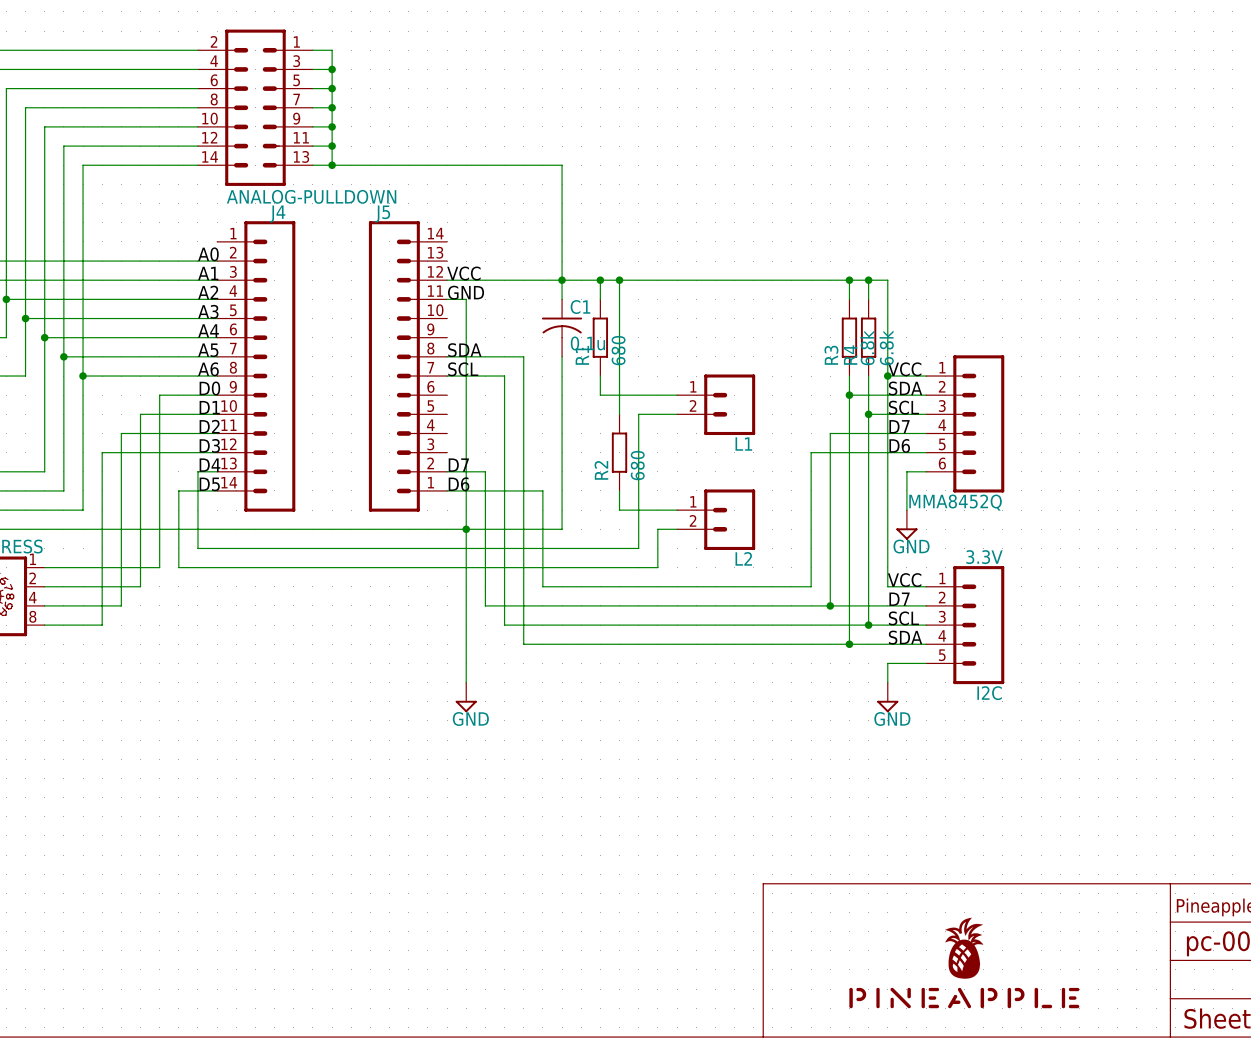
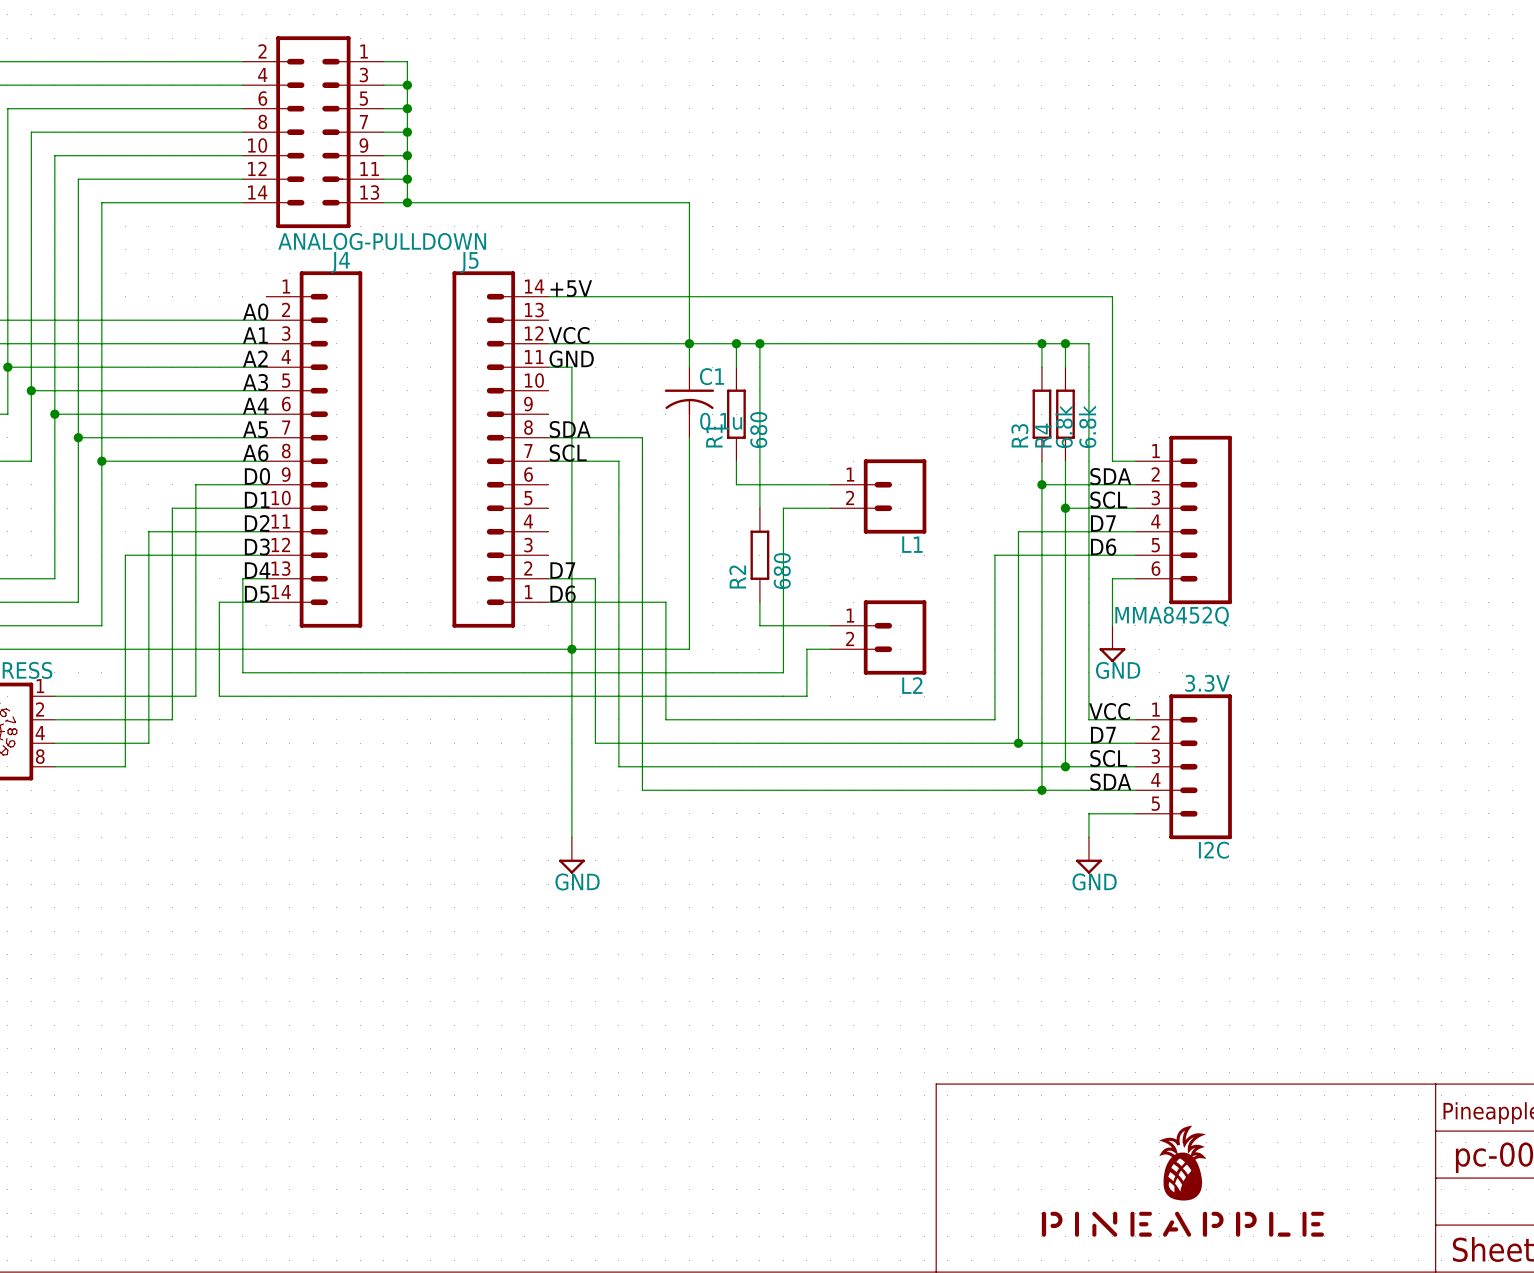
label: none -> +5V (571, 288)
label: VCC (904, 369) -> none
wire: (887, 376) (906, 376) -> (548, 296) (1112, 296) (1112, 461)
junction: (887, 376) -> none

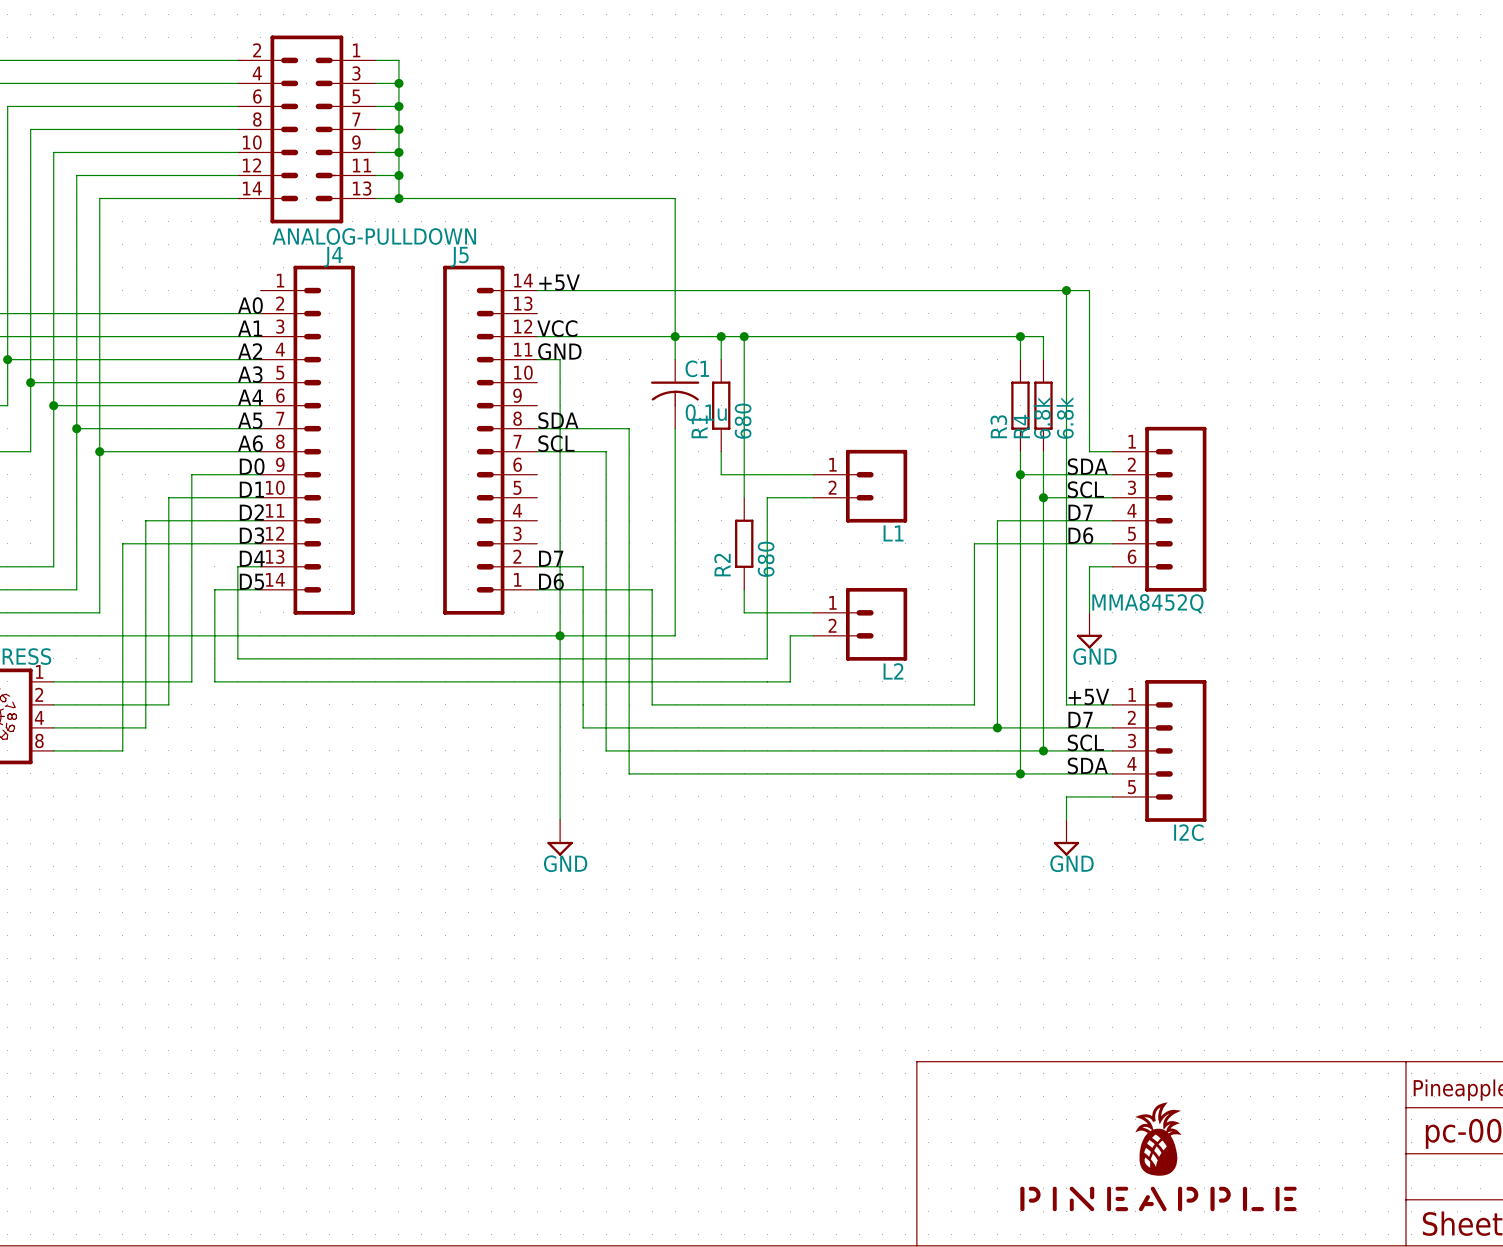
wire: (1065, 343) (1088, 343) -> (1066, 290) (1066, 336)
junction position: (1065, 343) -> (1066, 290)
I2C value: 3.3V (1207, 683) -> none
label: VCC (1109, 711) -> +5V (1088, 697)

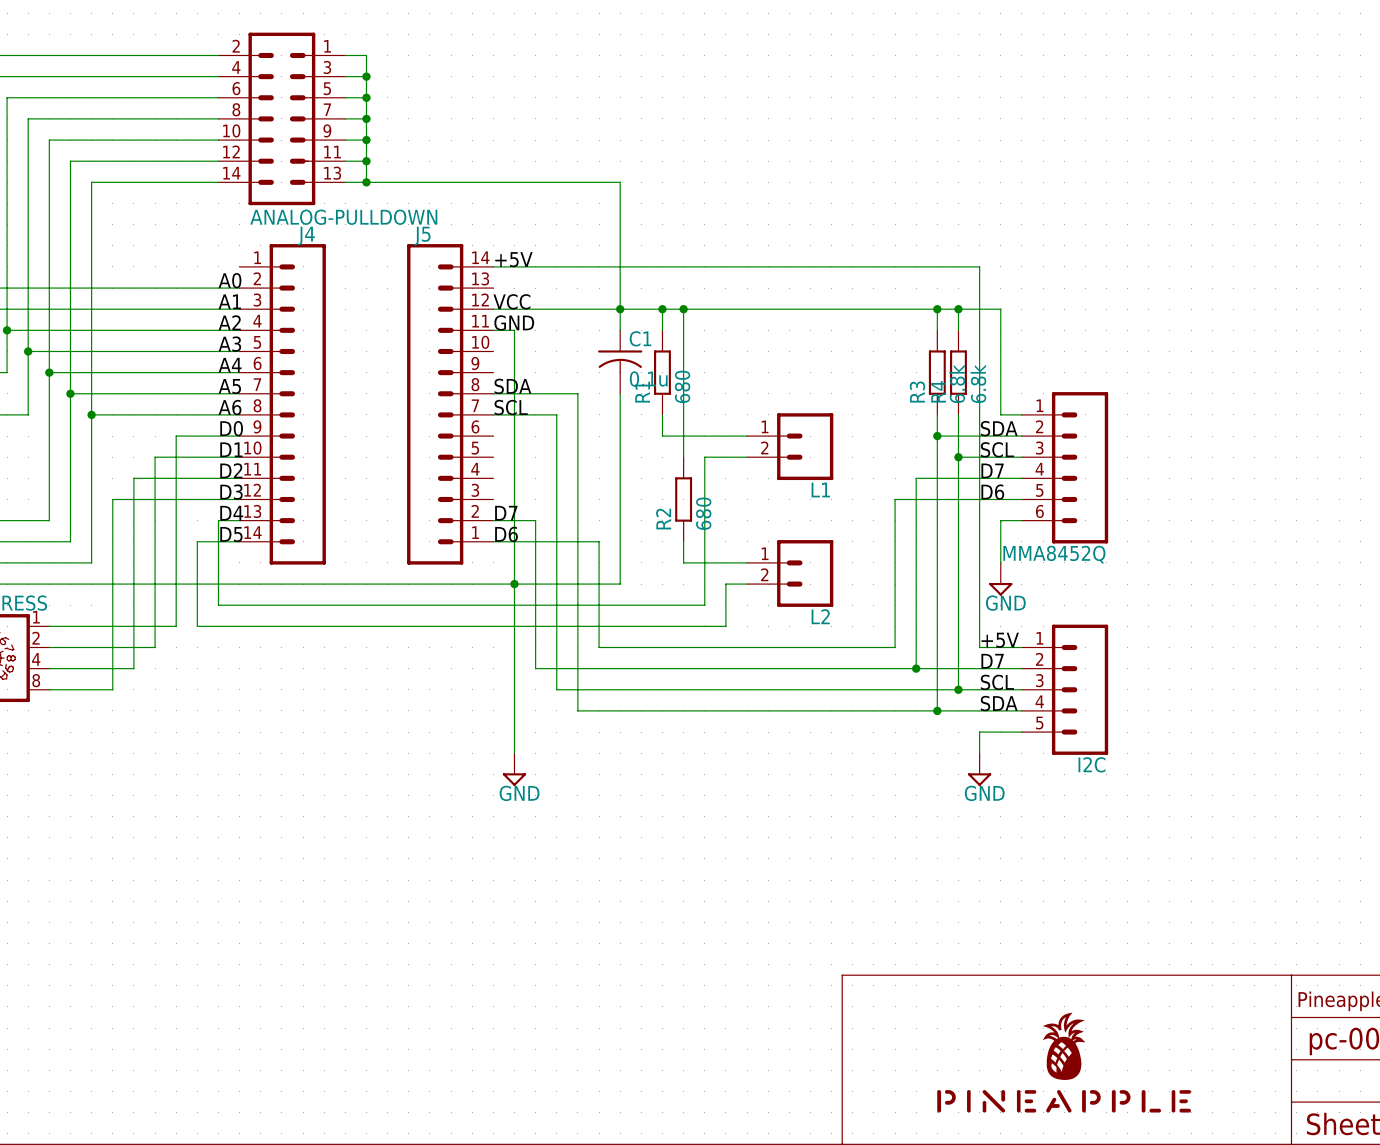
wire: (1066, 290) (1089, 290) (1089, 336) -> (958, 309) (1000, 309)
junction position: (1066, 290) -> (958, 309)

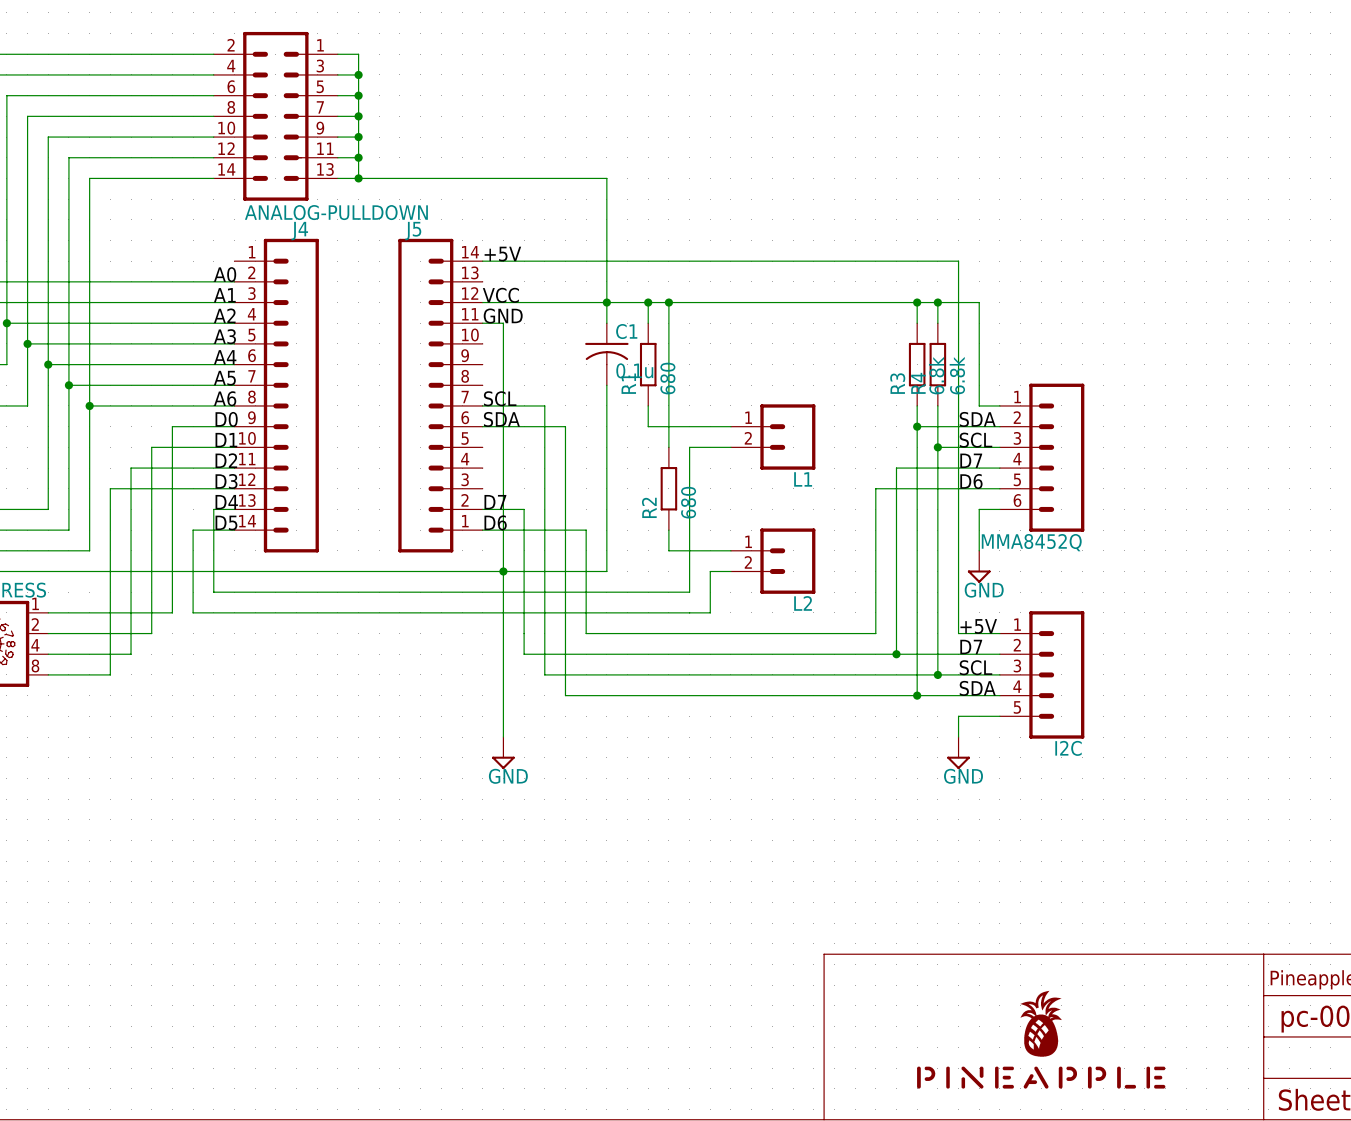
label position: SDA (512, 386) -> SDA (501, 419)
wire: (493, 393) (577, 393) (577, 436) -> (482, 426) (565, 426)

